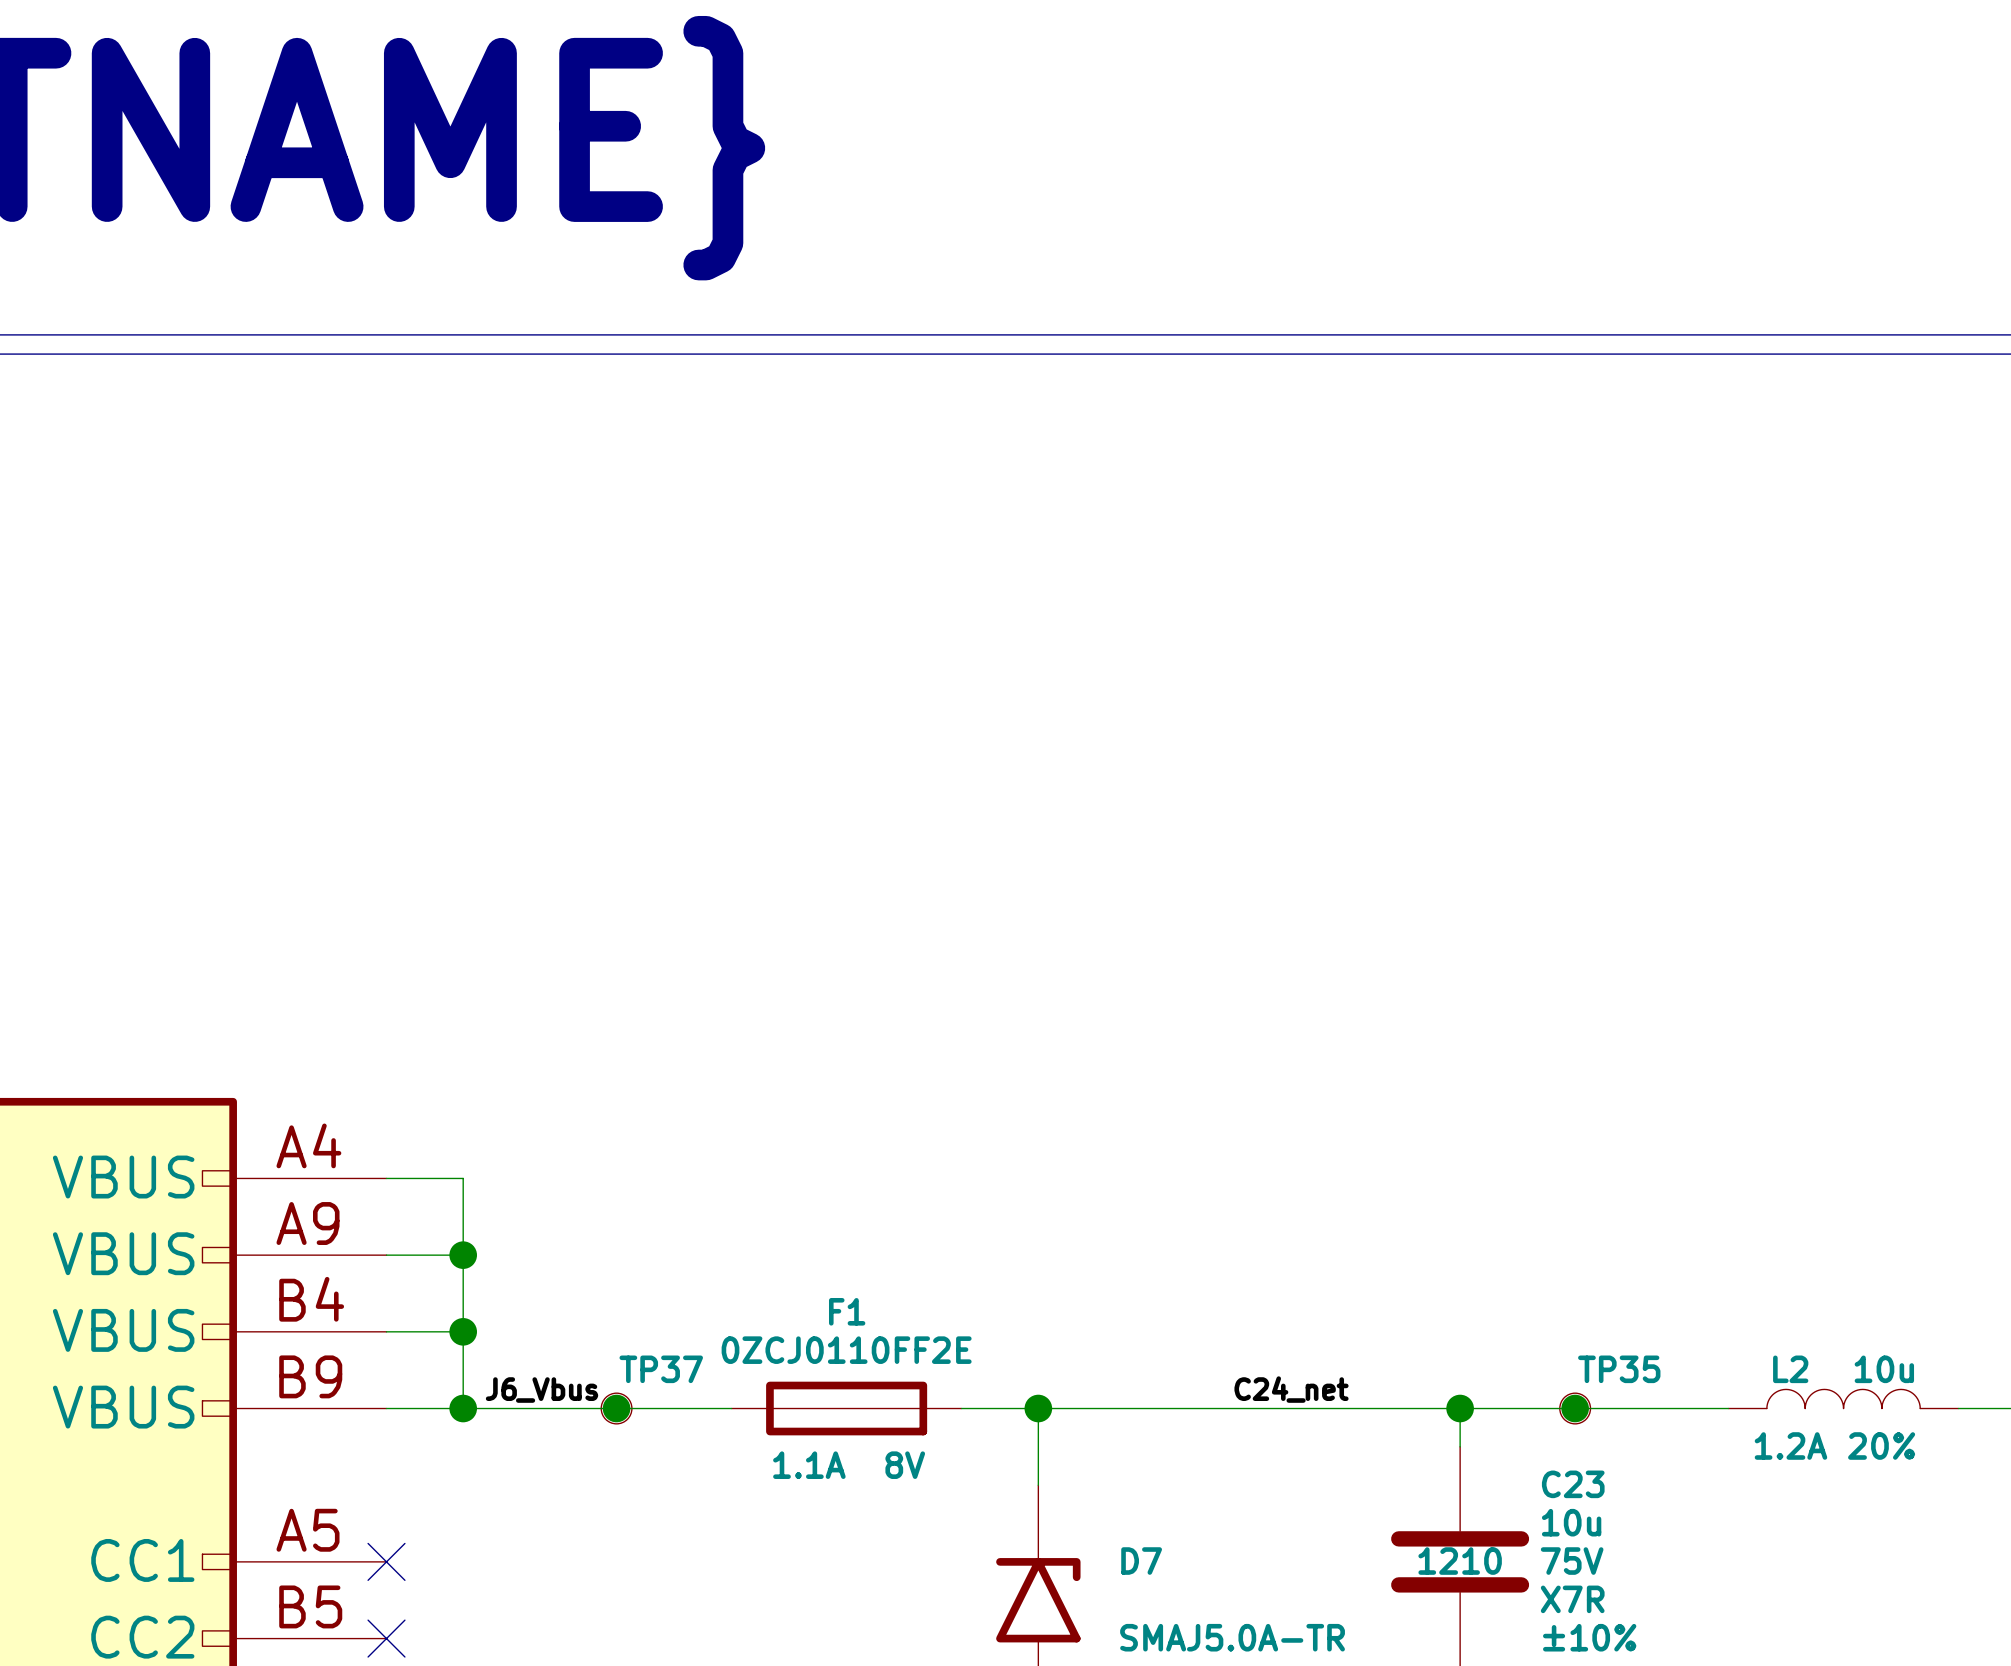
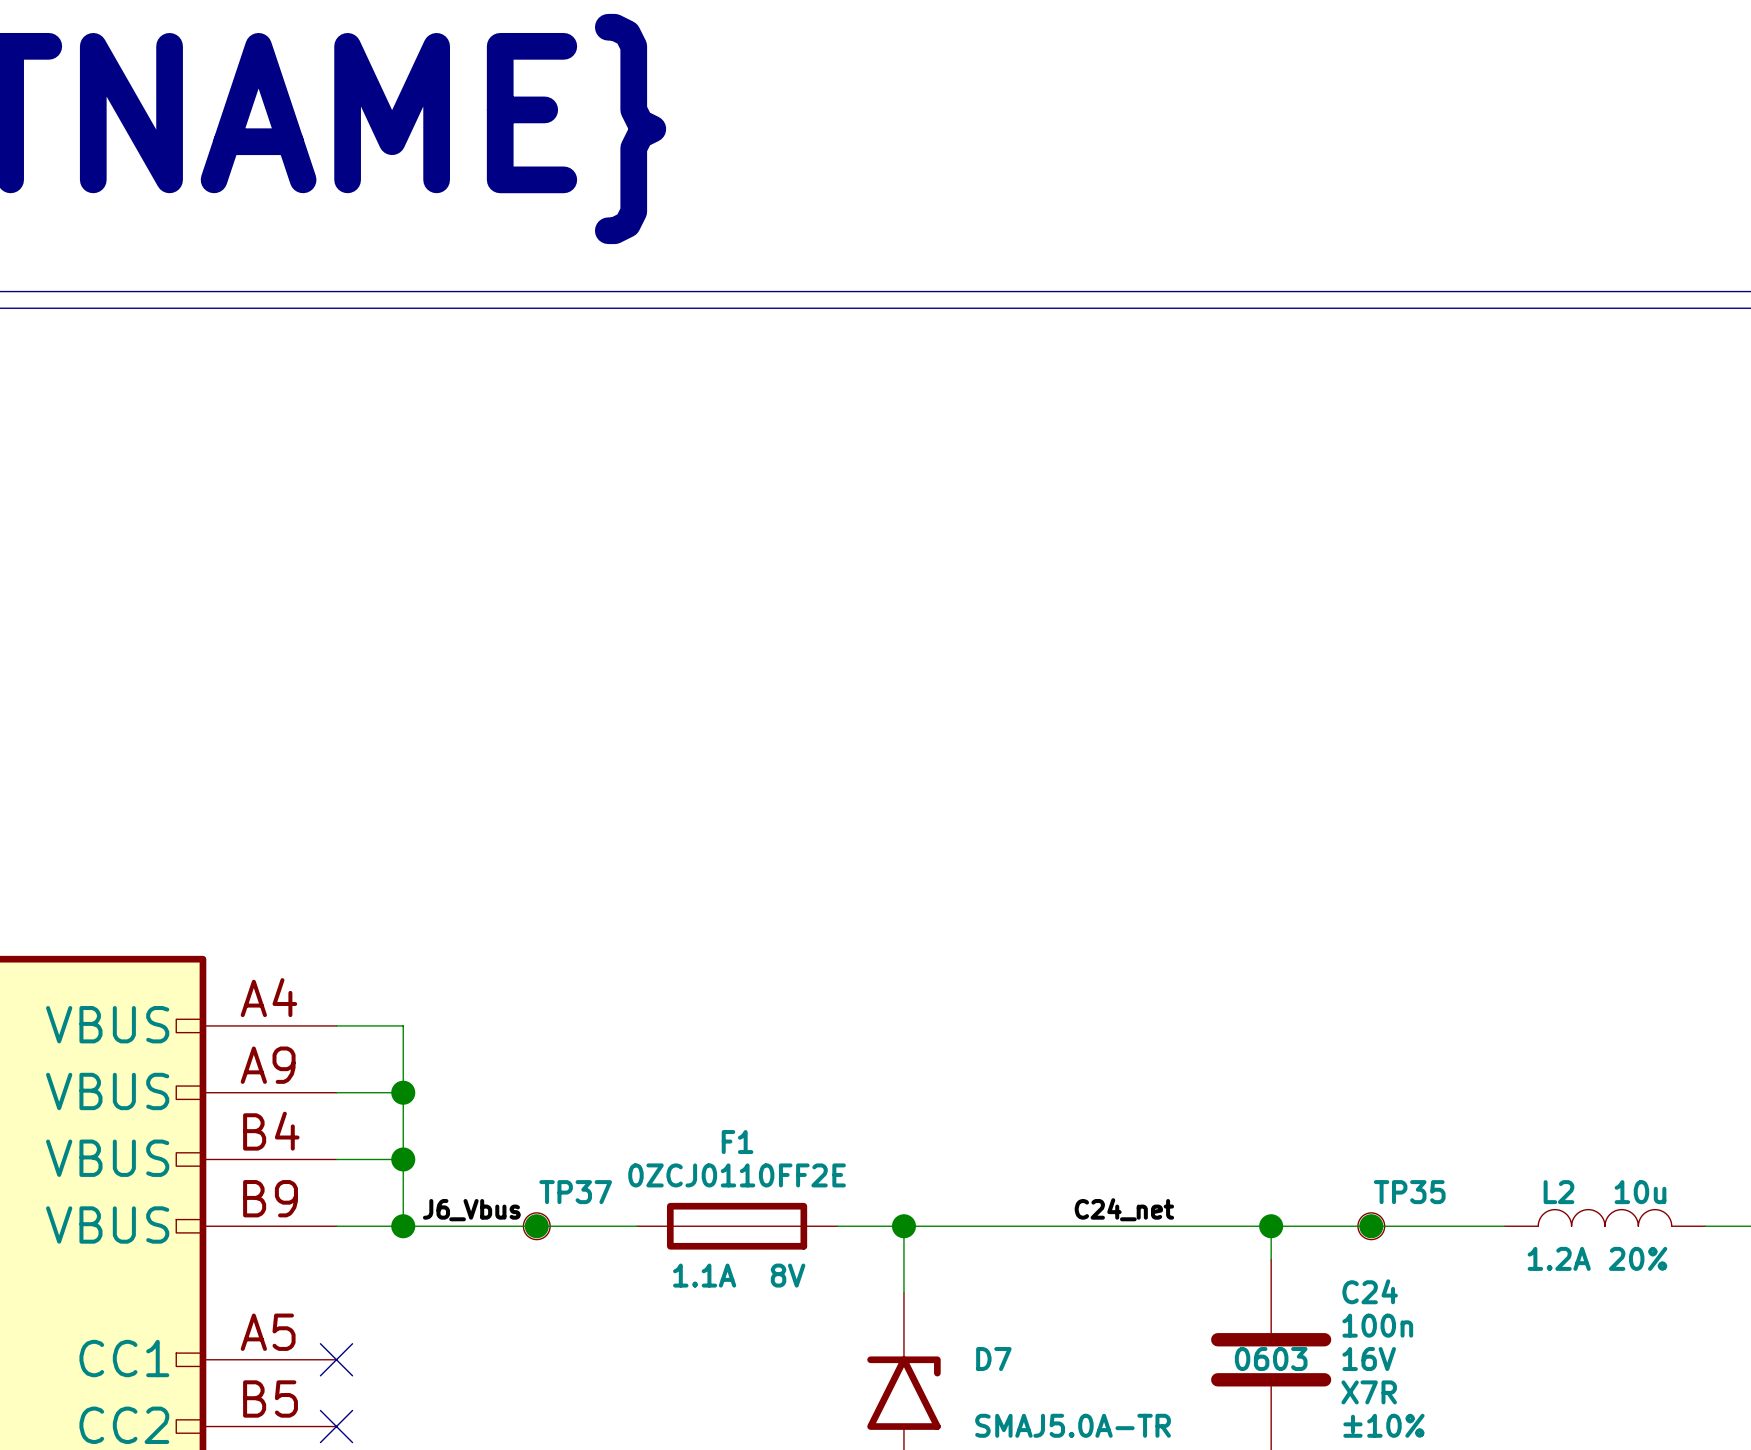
C23 name: C23 (1573, 1484) -> C24 (1370, 1291)
C23 value: 10u (1571, 1522) -> 100n (1377, 1325)
C23 text: 1210 (1460, 1561) -> 0603 (1271, 1359)
C23 text: 75V (1572, 1561) -> 16V (1369, 1359)

